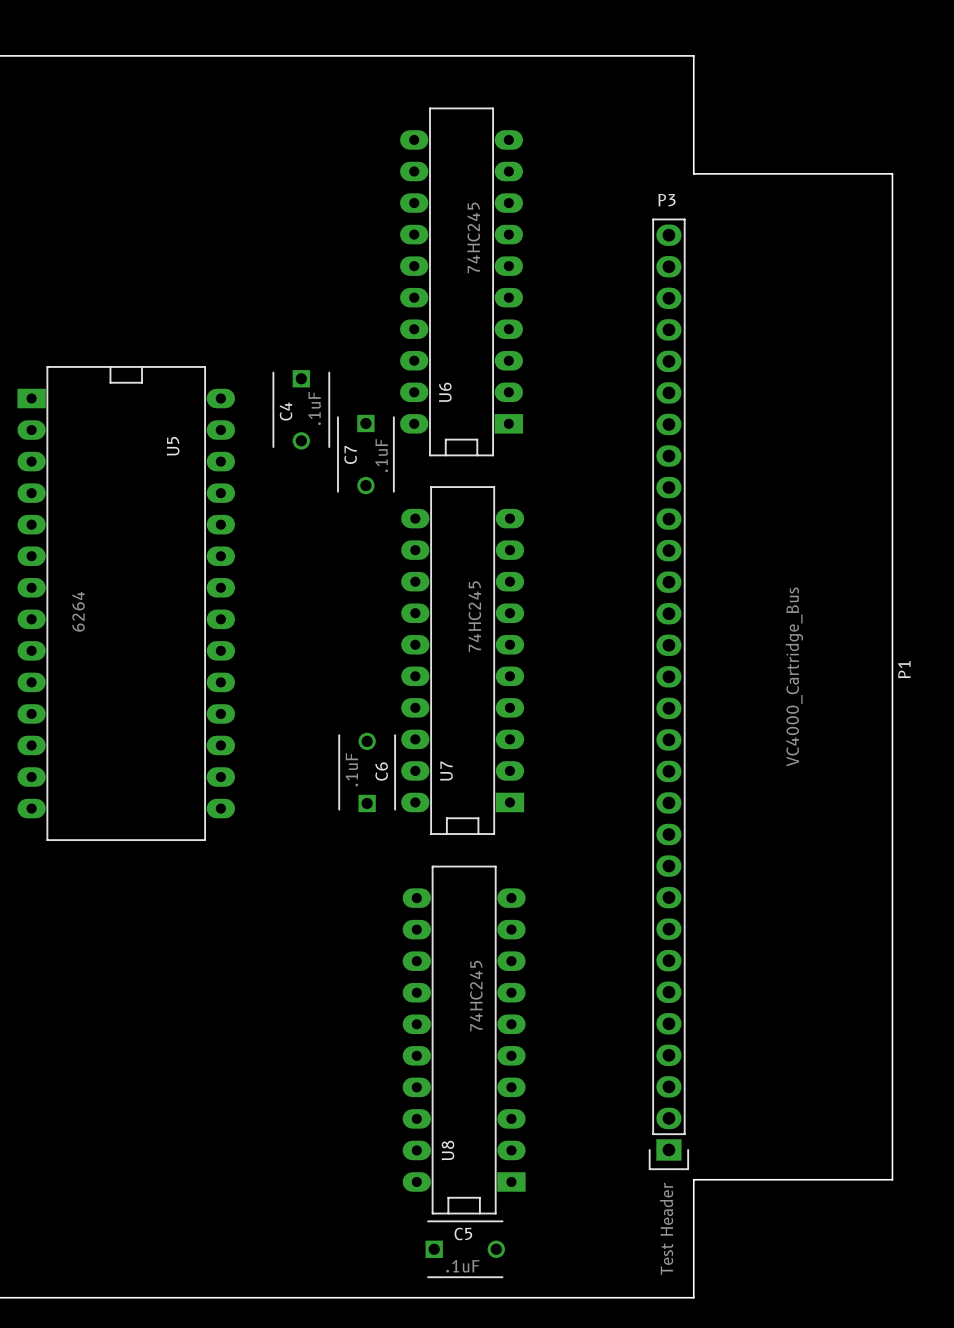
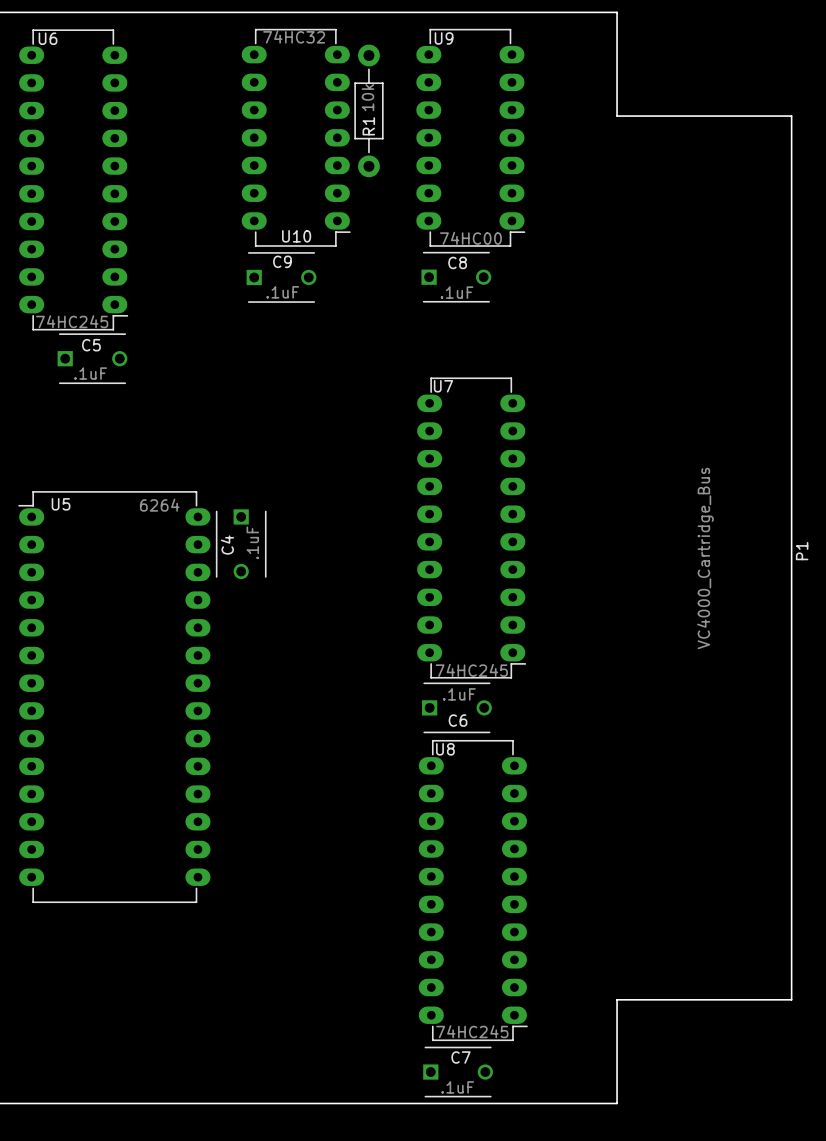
U6 footprint: [400, 107, 524, 457] -> [19, 29, 129, 331]
R1: none -> 10k (368, 110)
U10: none -> 74HC32 (296, 137)
U9: none -> 74HC00 (470, 137)
U6 value position: 74HC245 (473, 237) -> 74HC245 (72, 321)
C9: none -> .1uF (281, 277)
C8: none -> .1uF (456, 277)
U5 footprint: [17, 366, 236, 842] -> [18, 491, 211, 904]
U6 name position: U6 (445, 392) -> U6 (48, 38)
C4 position: (301, 409) -> (241, 544)
U5 name position: U5 (173, 446) -> U5 (61, 504)
C7 rotation: 0° (365, 454) -> 90° counterclockwise (458, 1072)
C7 position: (365, 454) -> (458, 1072)
U7 footprint: [401, 486, 525, 835] -> [417, 377, 527, 679]
U5 value position: 6264 (78, 611) -> 6264 (159, 505)
U7 value position: 74HC245 (474, 616) -> 74HC245 (471, 670)
P3: Test Header (668, 694) -> none
U7 name position: U7 (446, 771) -> U7 (443, 386)
C6 rotation: 0° (367, 772) -> 90° clockwise (456, 707)
C6 position: (367, 772) -> (456, 707)
U8 footprint: [402, 865, 526, 1215] -> [418, 739, 528, 1042]
U8 value position: 74HC245 (476, 996) -> 74HC245 (472, 1031)
U8 name position: U8 (447, 1150) -> U8 (445, 749)
C5 position: (465, 1249) -> (92, 358)

